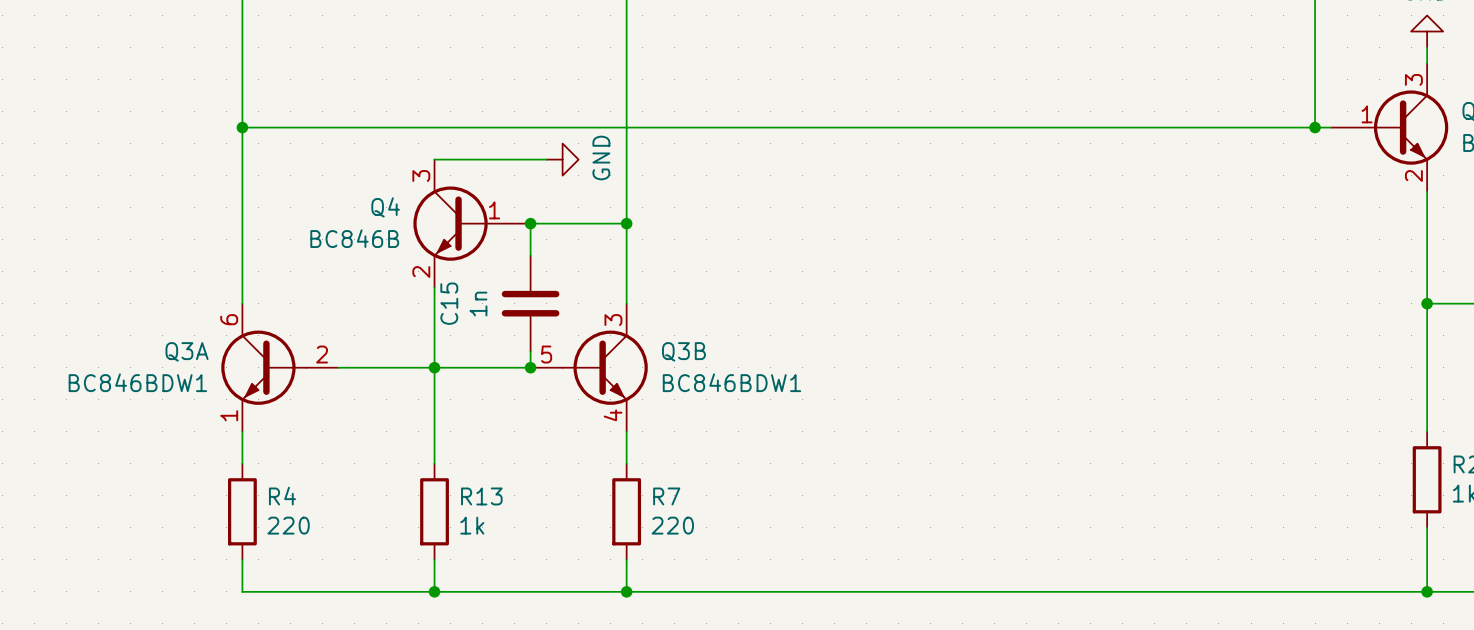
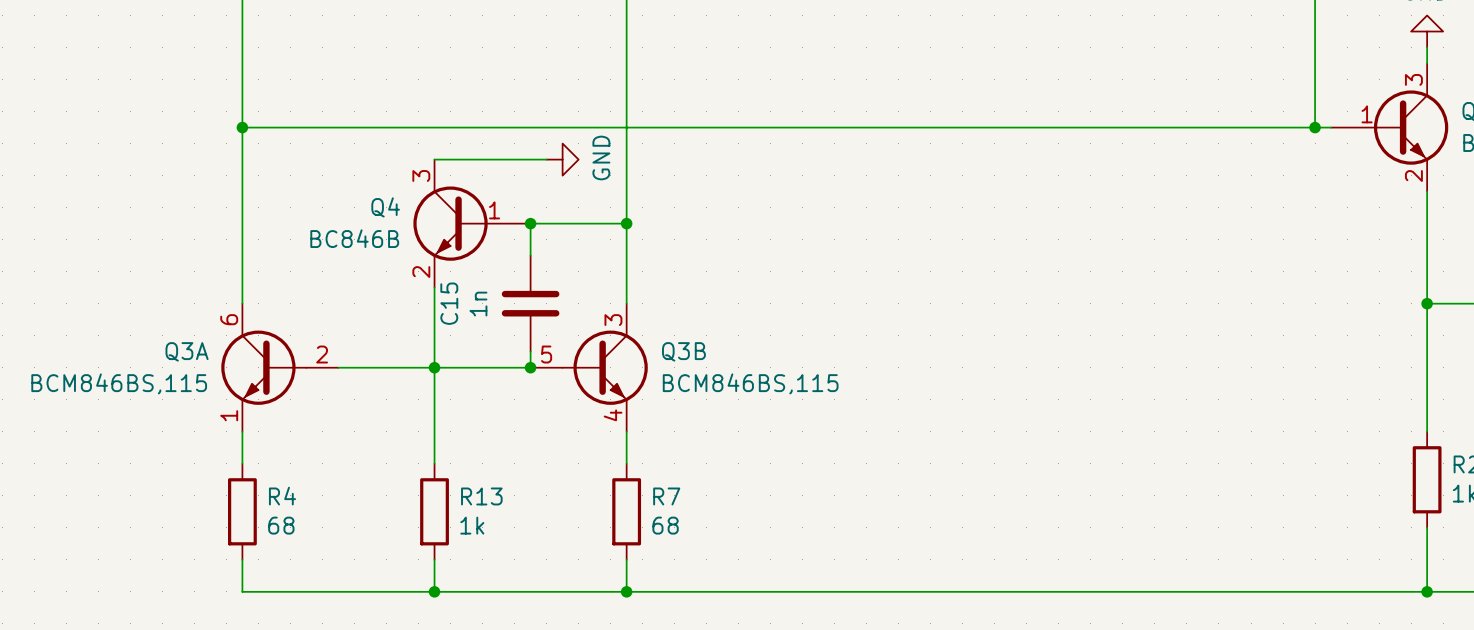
Q3A value: BC846BDW1 (137, 382) -> BCM846BS,115 (119, 383)
Q3B value: BC846BDW1 (731, 382) -> BCM846BS,115 (750, 383)
R4 value: 220 (288, 525) -> 68 (281, 525)
R7 value: 220 (672, 525) -> 68 (665, 525)

